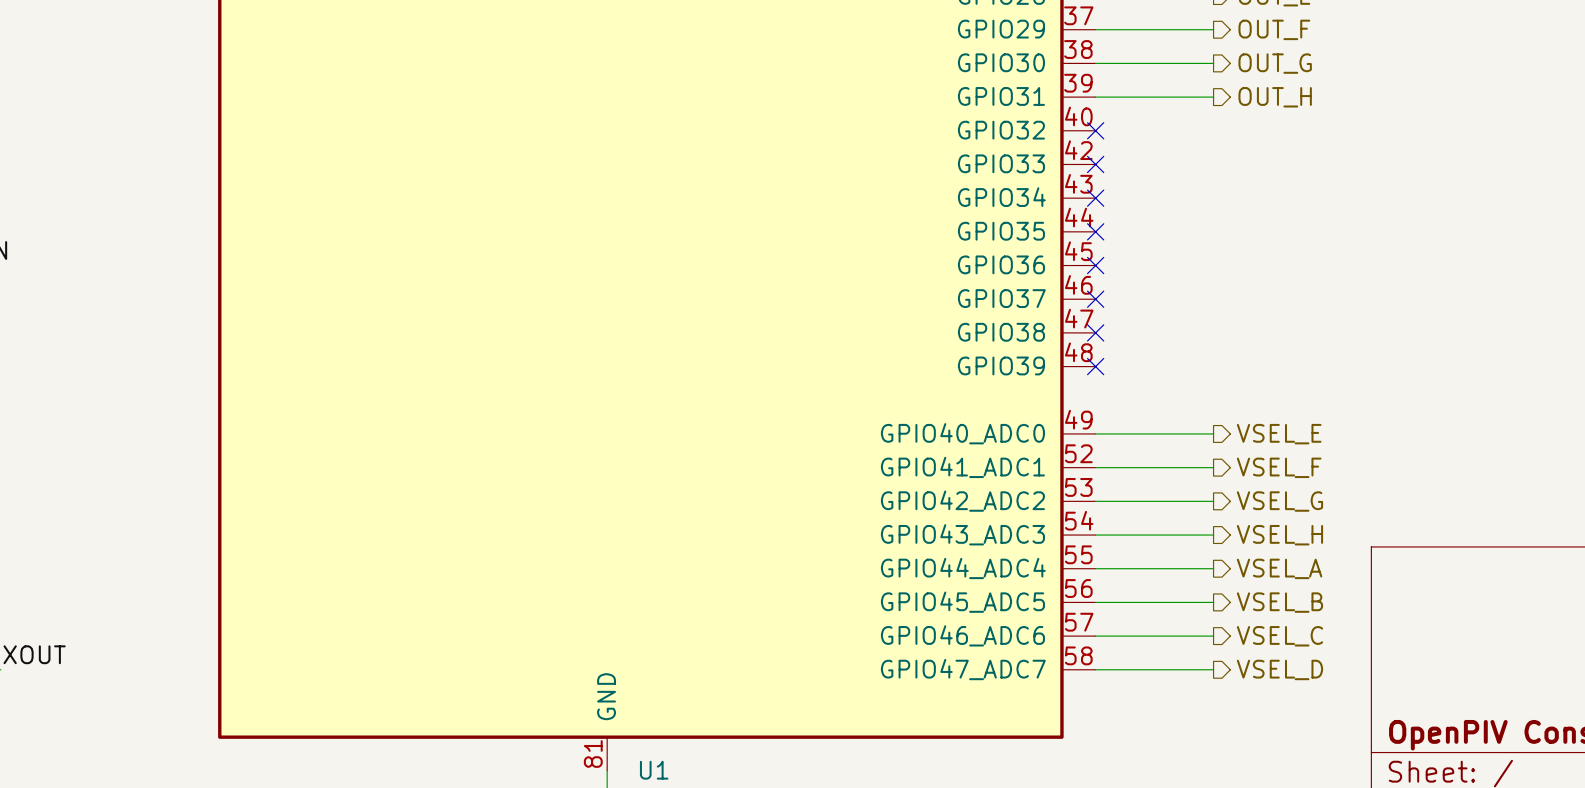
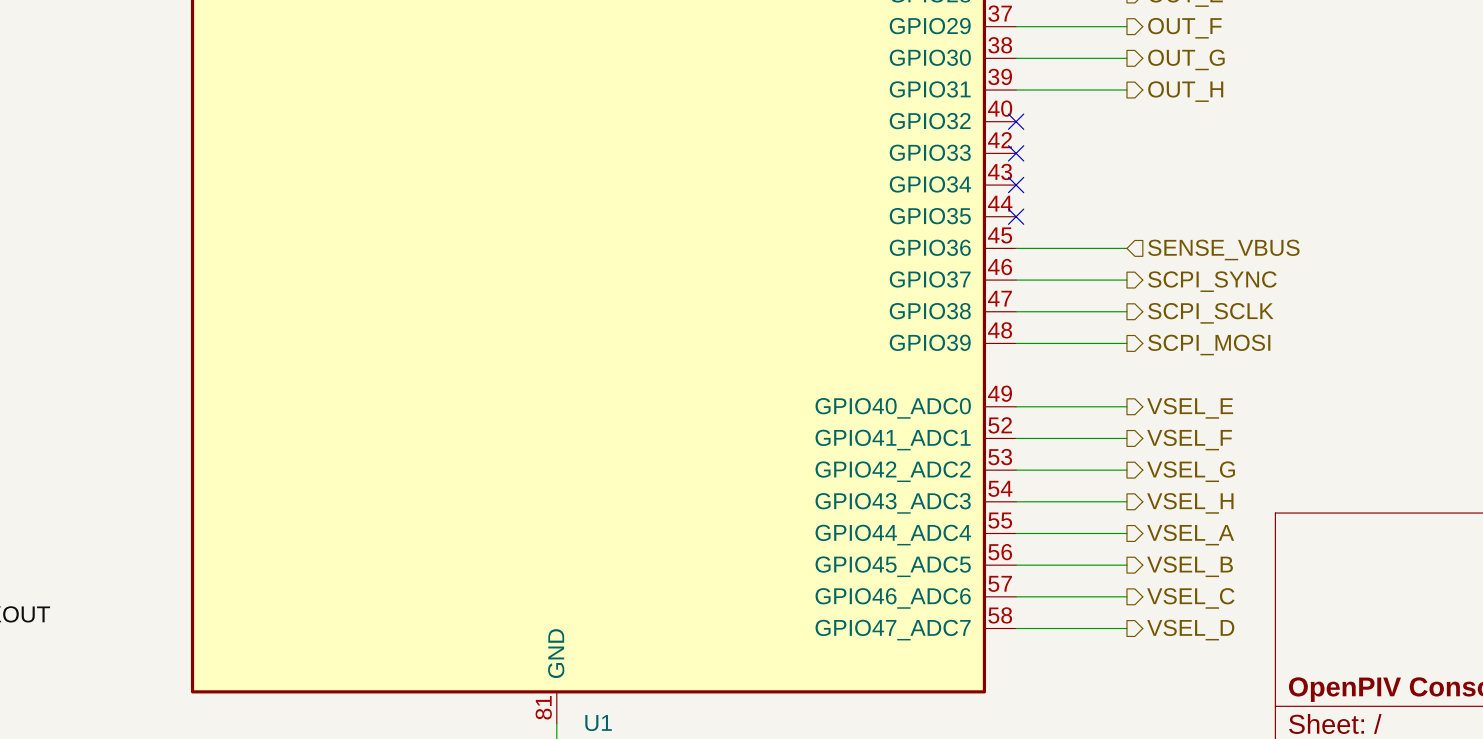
wire: none -> (1016, 248) (1126, 248)
no-connect mark: (1095, 265) -> none
hierarchical label: none -> SENSE_VBUS (1223, 249)
wire: none -> (1016, 280) (1126, 280)
no-connect mark: (1095, 299) -> none
hierarchical label: none -> SCPI_SYNC (1212, 281)
wire: none -> (1016, 311) (1126, 311)
no-connect mark: (1095, 332) -> none
hierarchical label: none -> SCPI_SCLK (1210, 313)
wire: none -> (1016, 343) (1126, 343)
no-connect mark: (1095, 366) -> none
hierarchical label: none -> SCPI_MOSI (1209, 345)

